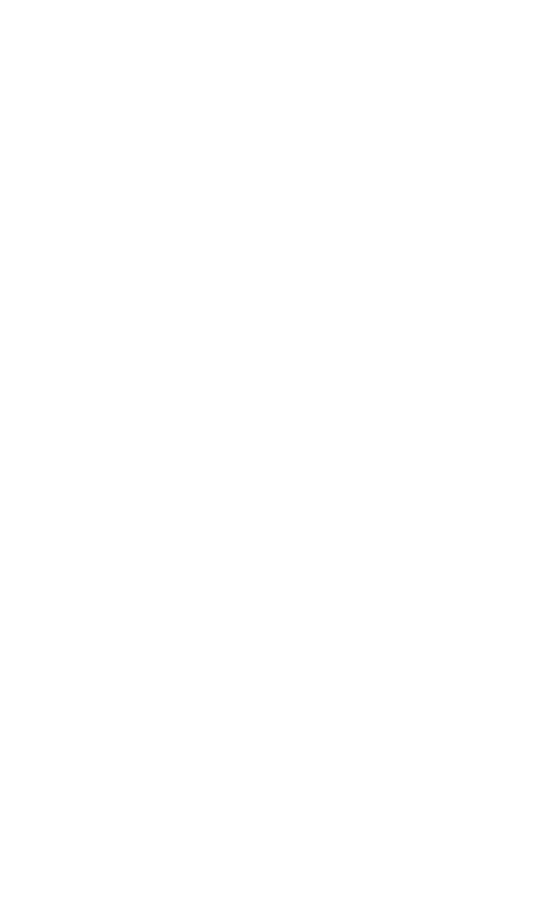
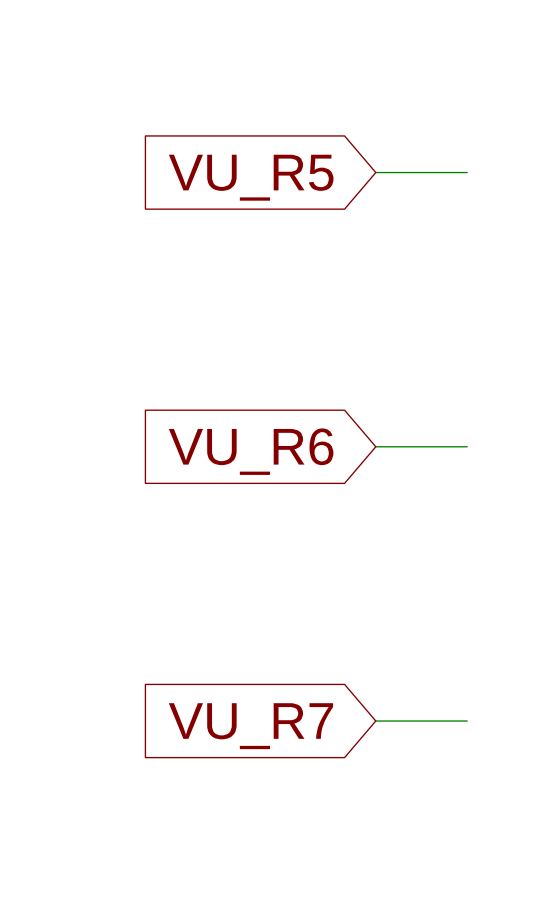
wire: none -> (375, 172) (467, 172)
global label: none -> VU_R5 (251, 177)
wire: none -> (375, 446) (467, 446)
global label: none -> VU_R6 (251, 451)
wire: none -> (375, 721) (467, 721)
global label: none -> VU_R7 (250, 726)

